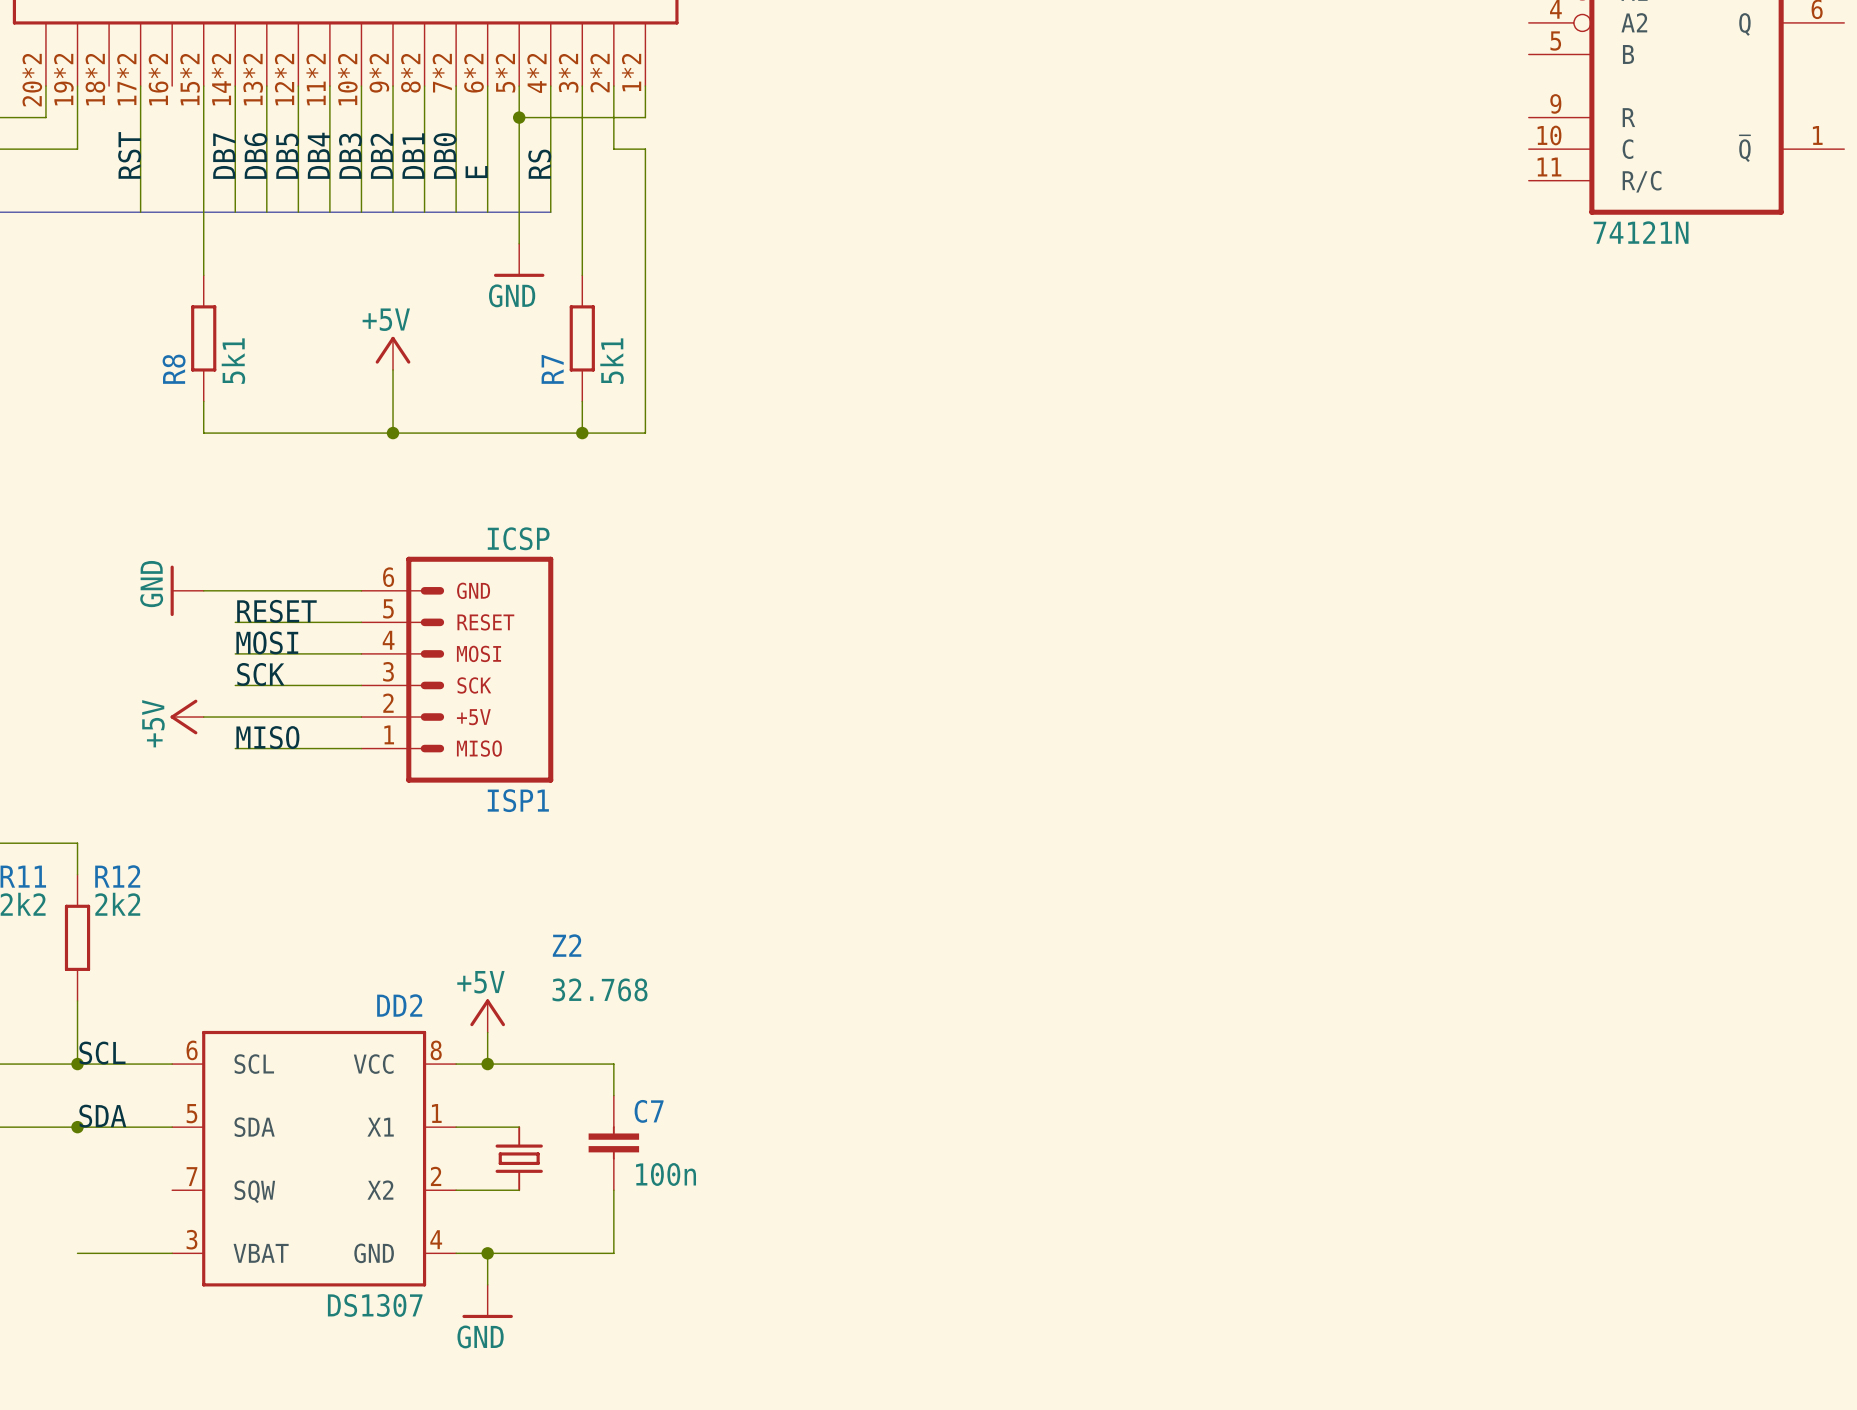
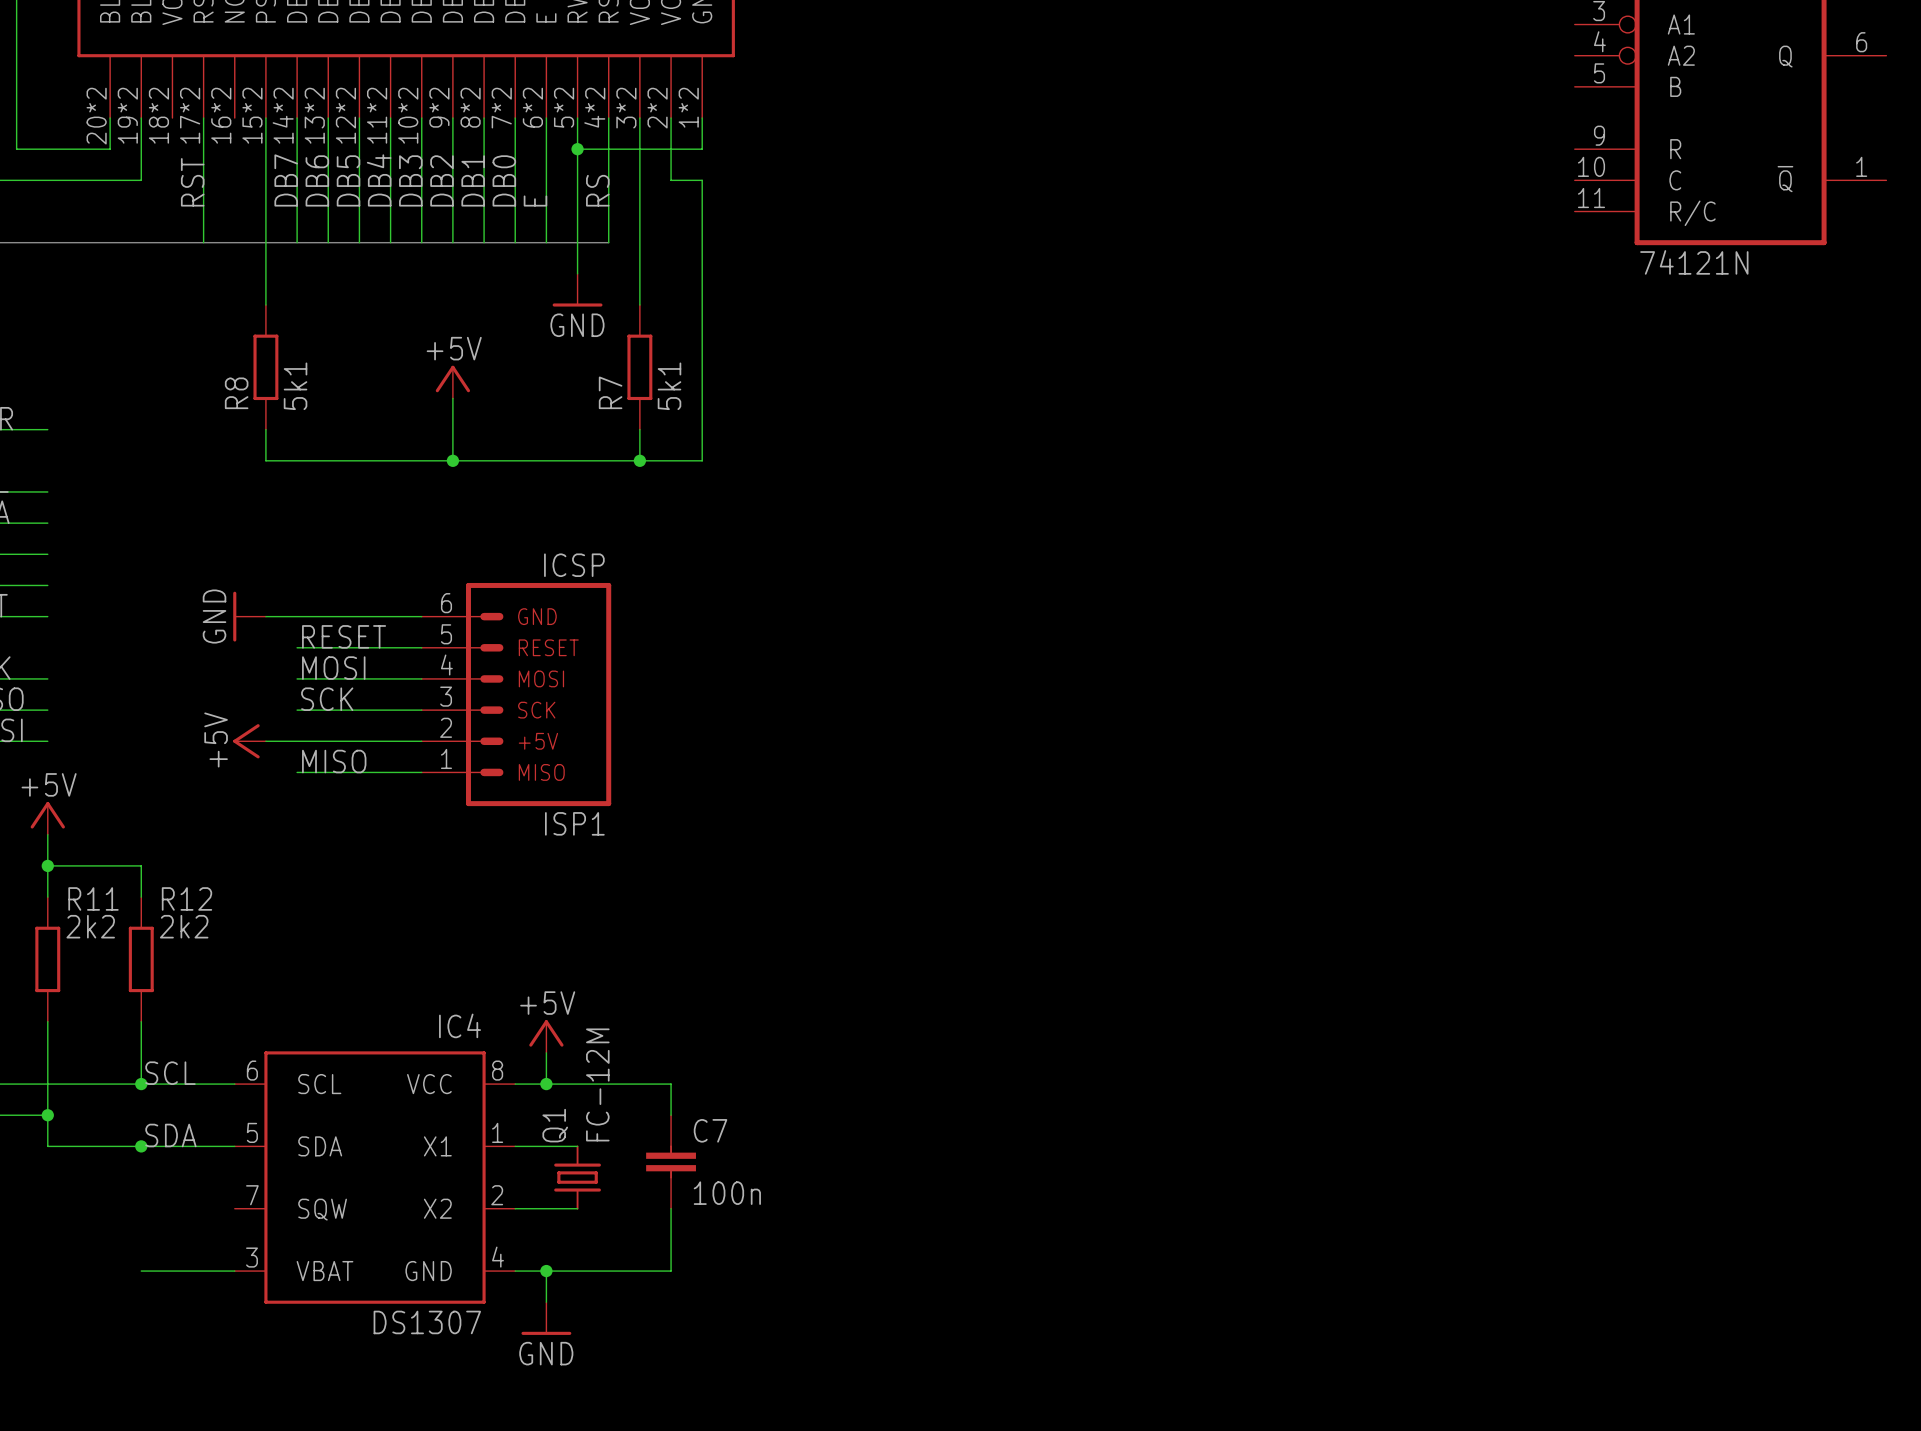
Z2 name: Z2 (567, 945) -> Q1 (555, 1125)
Z2 value: 32.768 (600, 989) -> FC-12M (597, 1084)
DD2 name: DD2 (399, 1005) -> IC4 (460, 1025)

